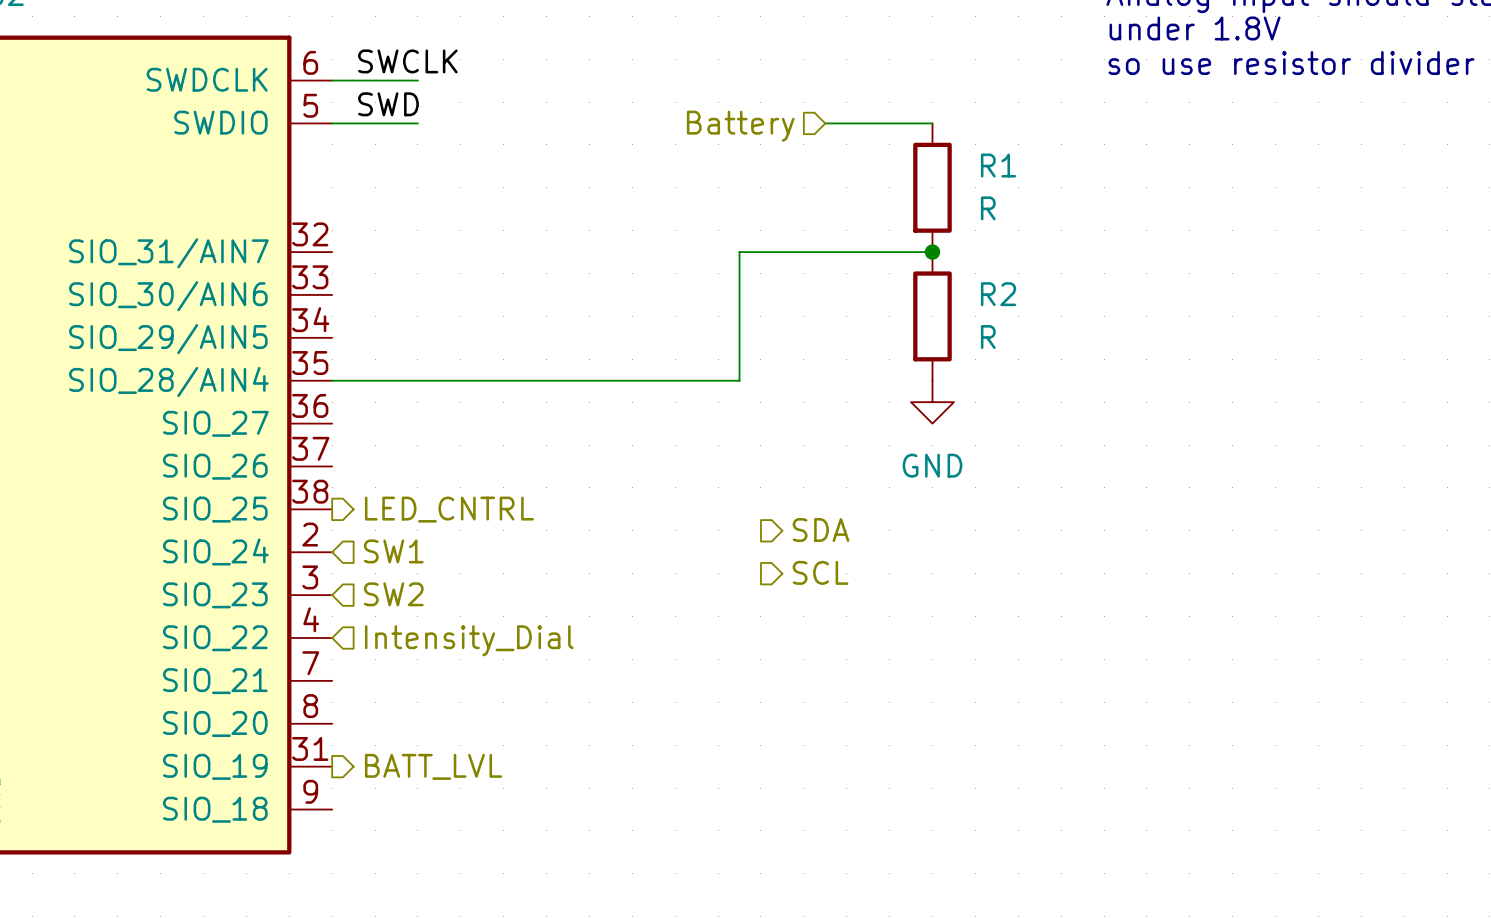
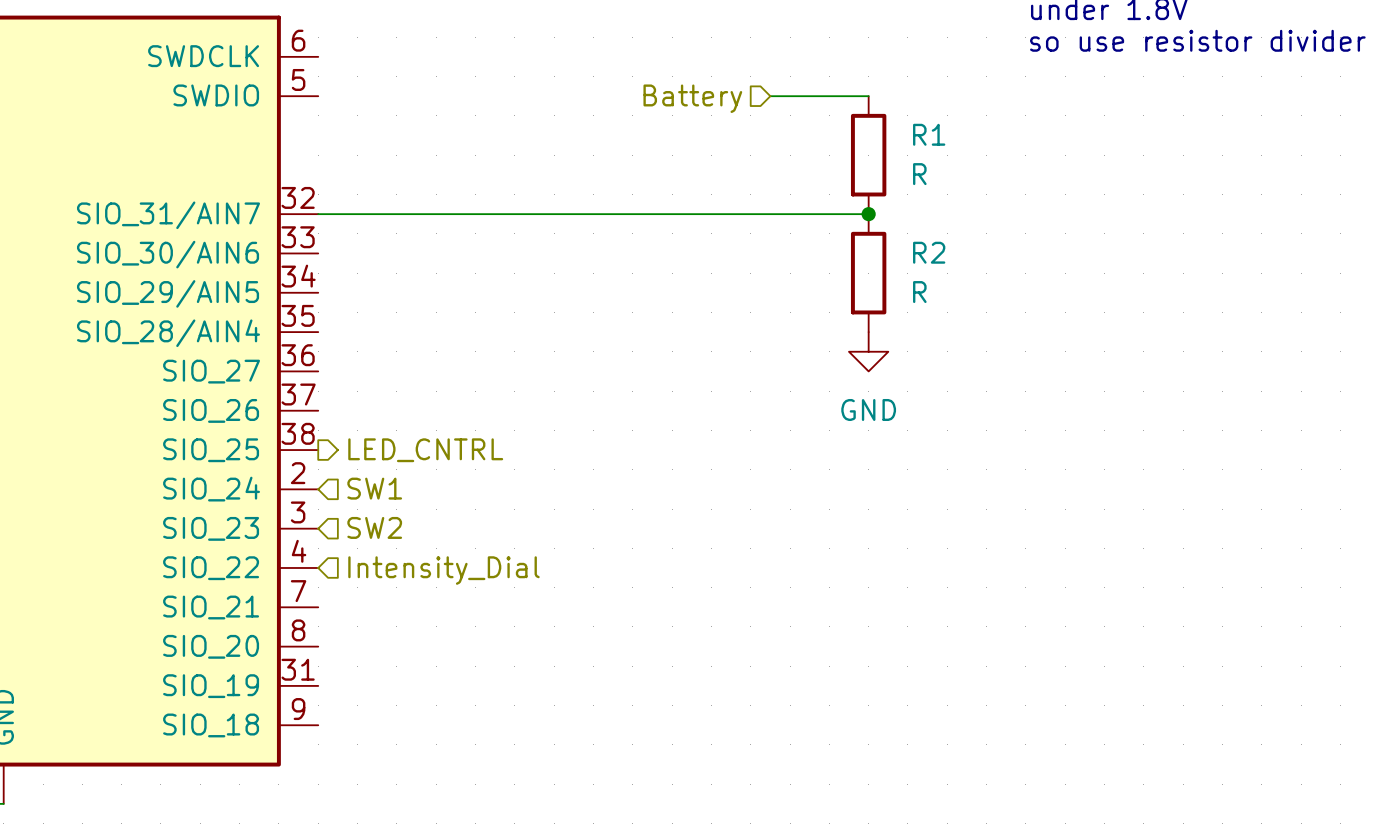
label: SWCLK (407, 61) -> none
wire: (332, 80) (417, 80) -> none
label: SWD (388, 104) -> none
wire: (332, 123) (417, 123) -> none
wire: (739, 252) (739, 380) (332, 380) -> (691, 214) (318, 214)
hierarchical label: SDA (821, 530) -> none
hierarchical label: SCL (820, 572) -> none
hierarchical label: BATT_LVL (433, 766) -> none

